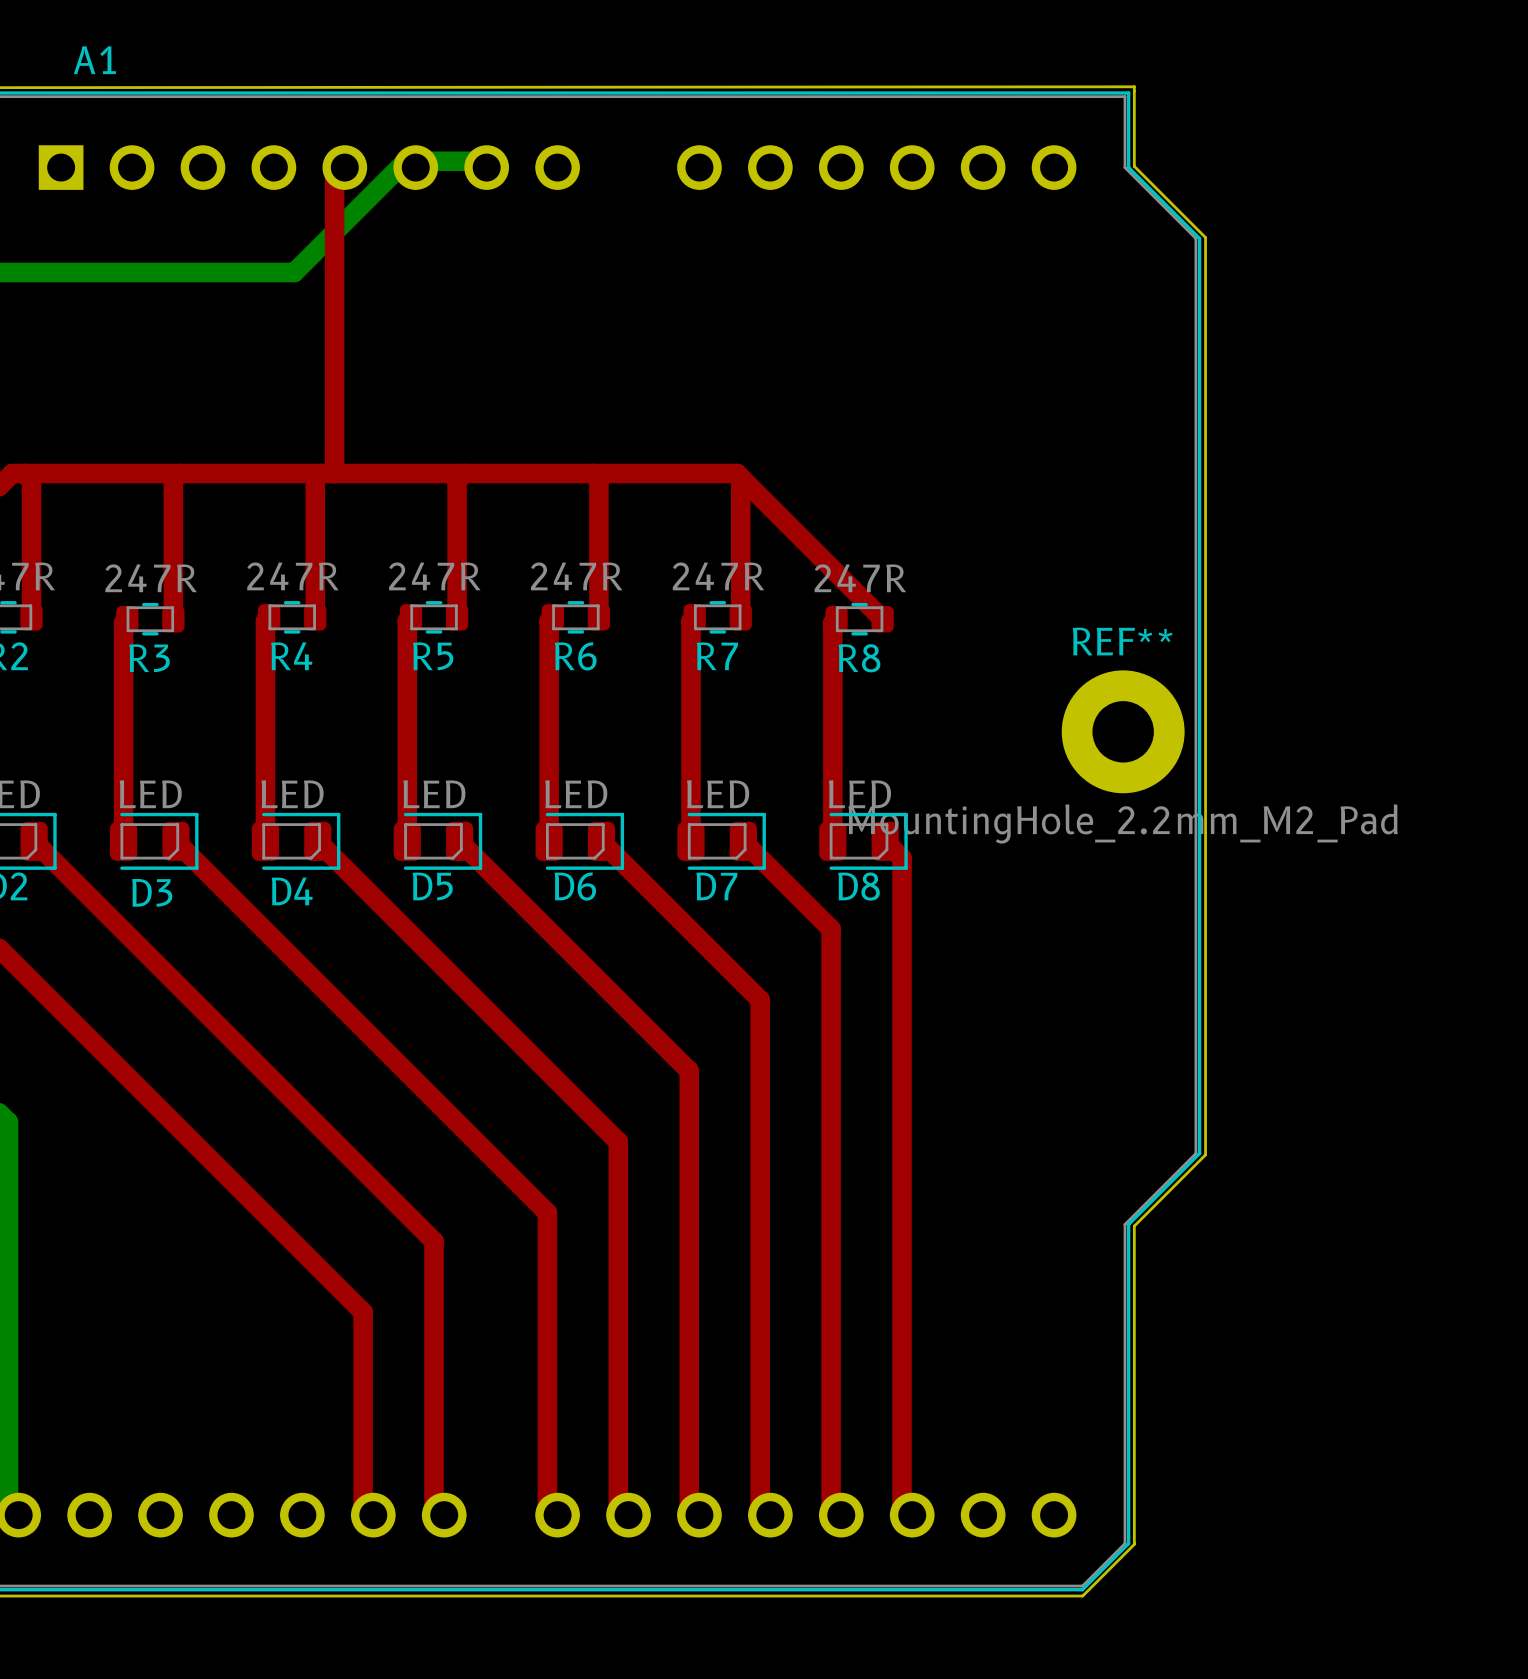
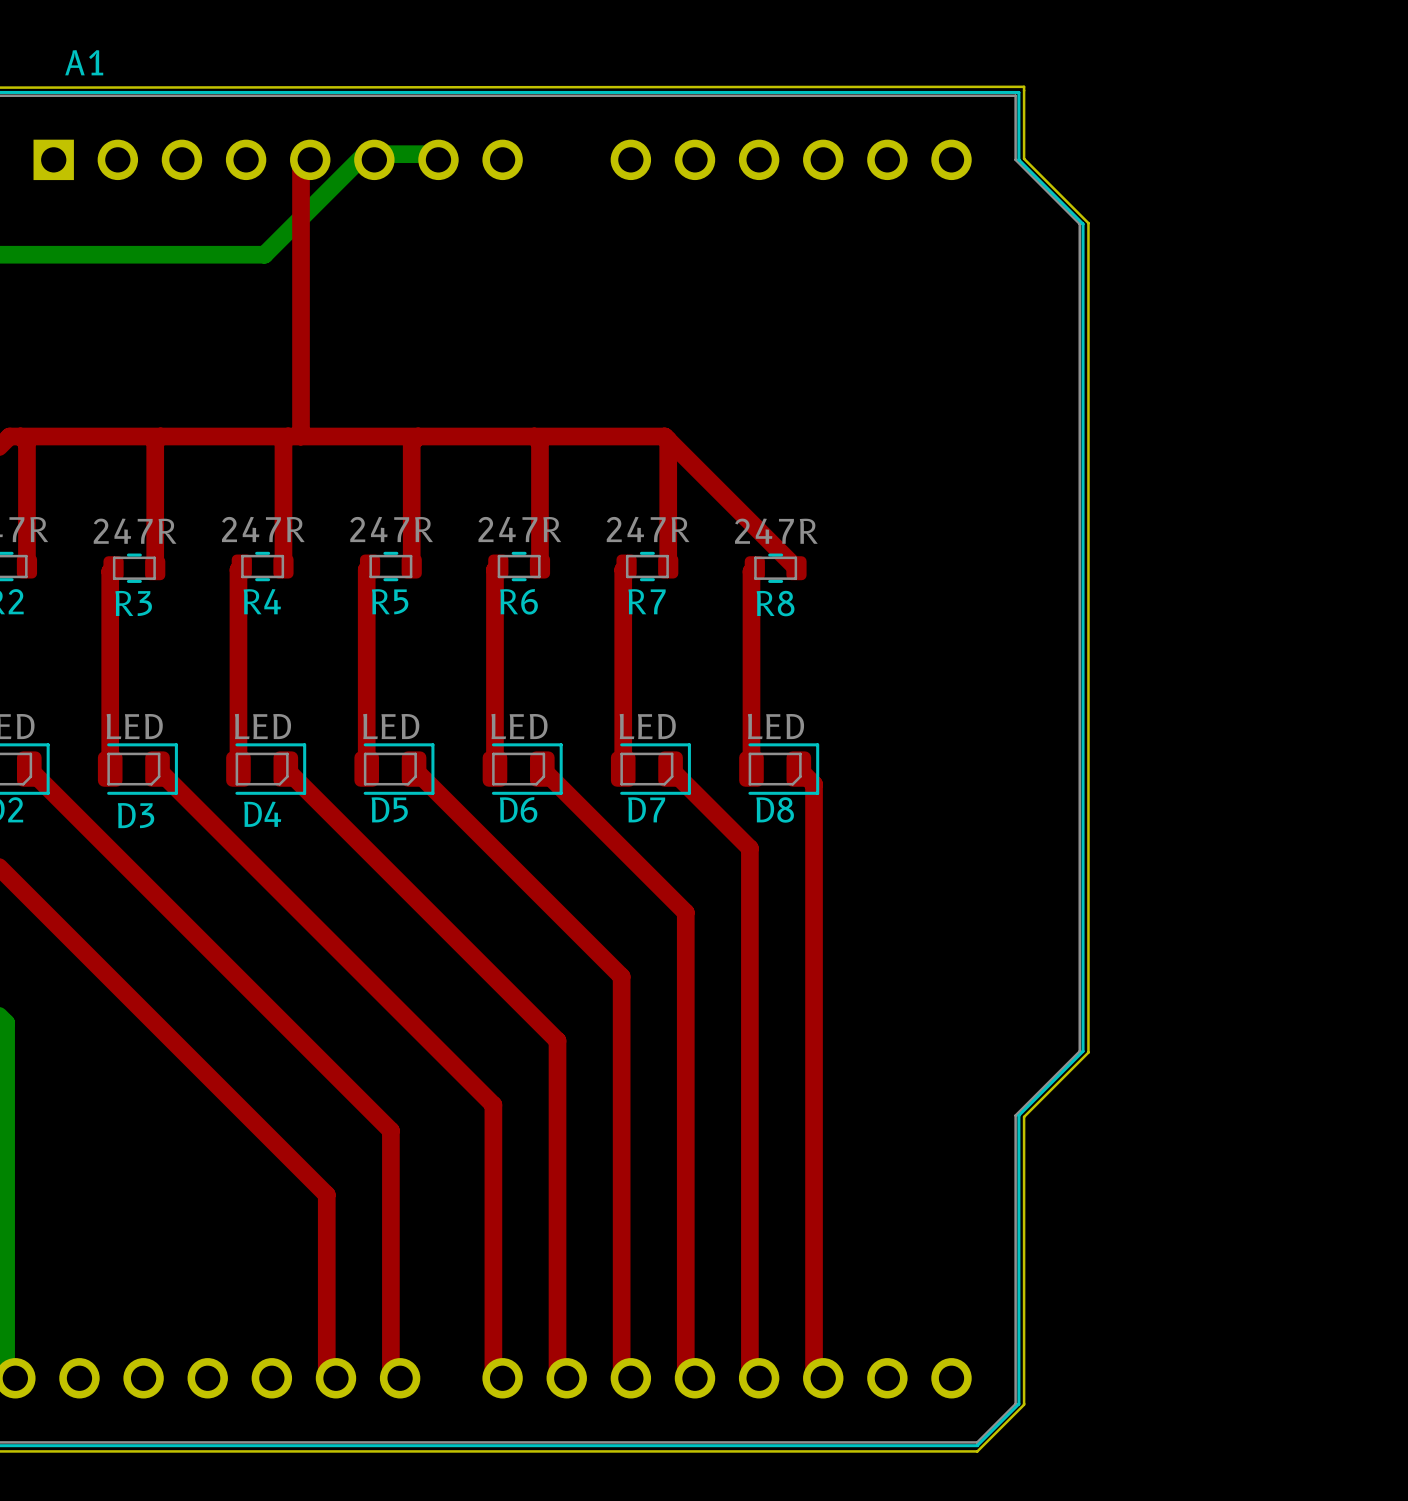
REF**: MountingHole_2.2mm_M2_Pad (1123, 731) -> none

